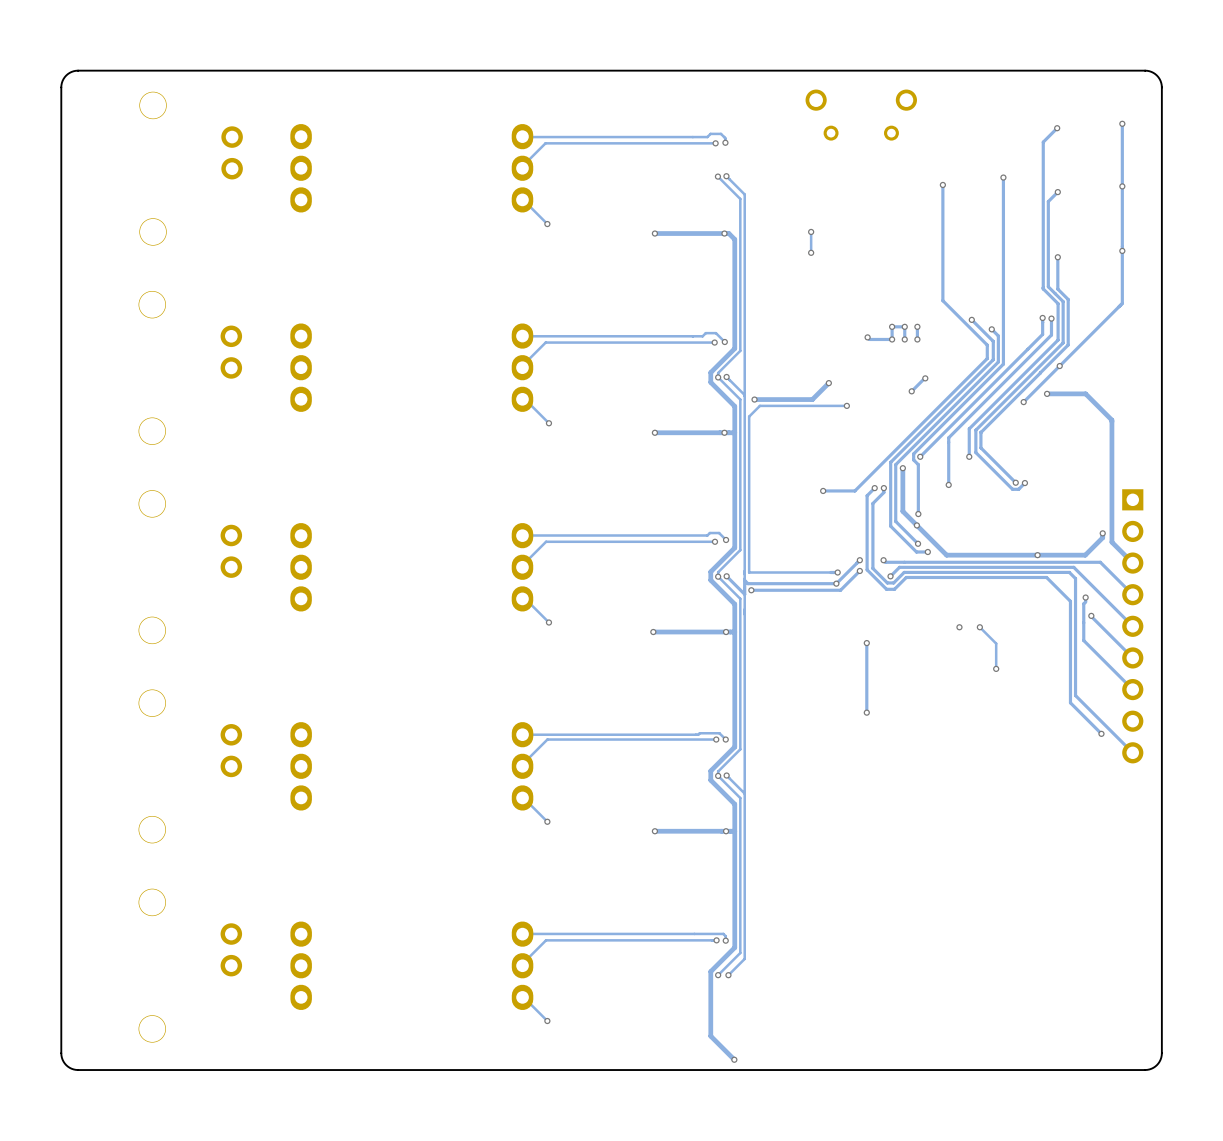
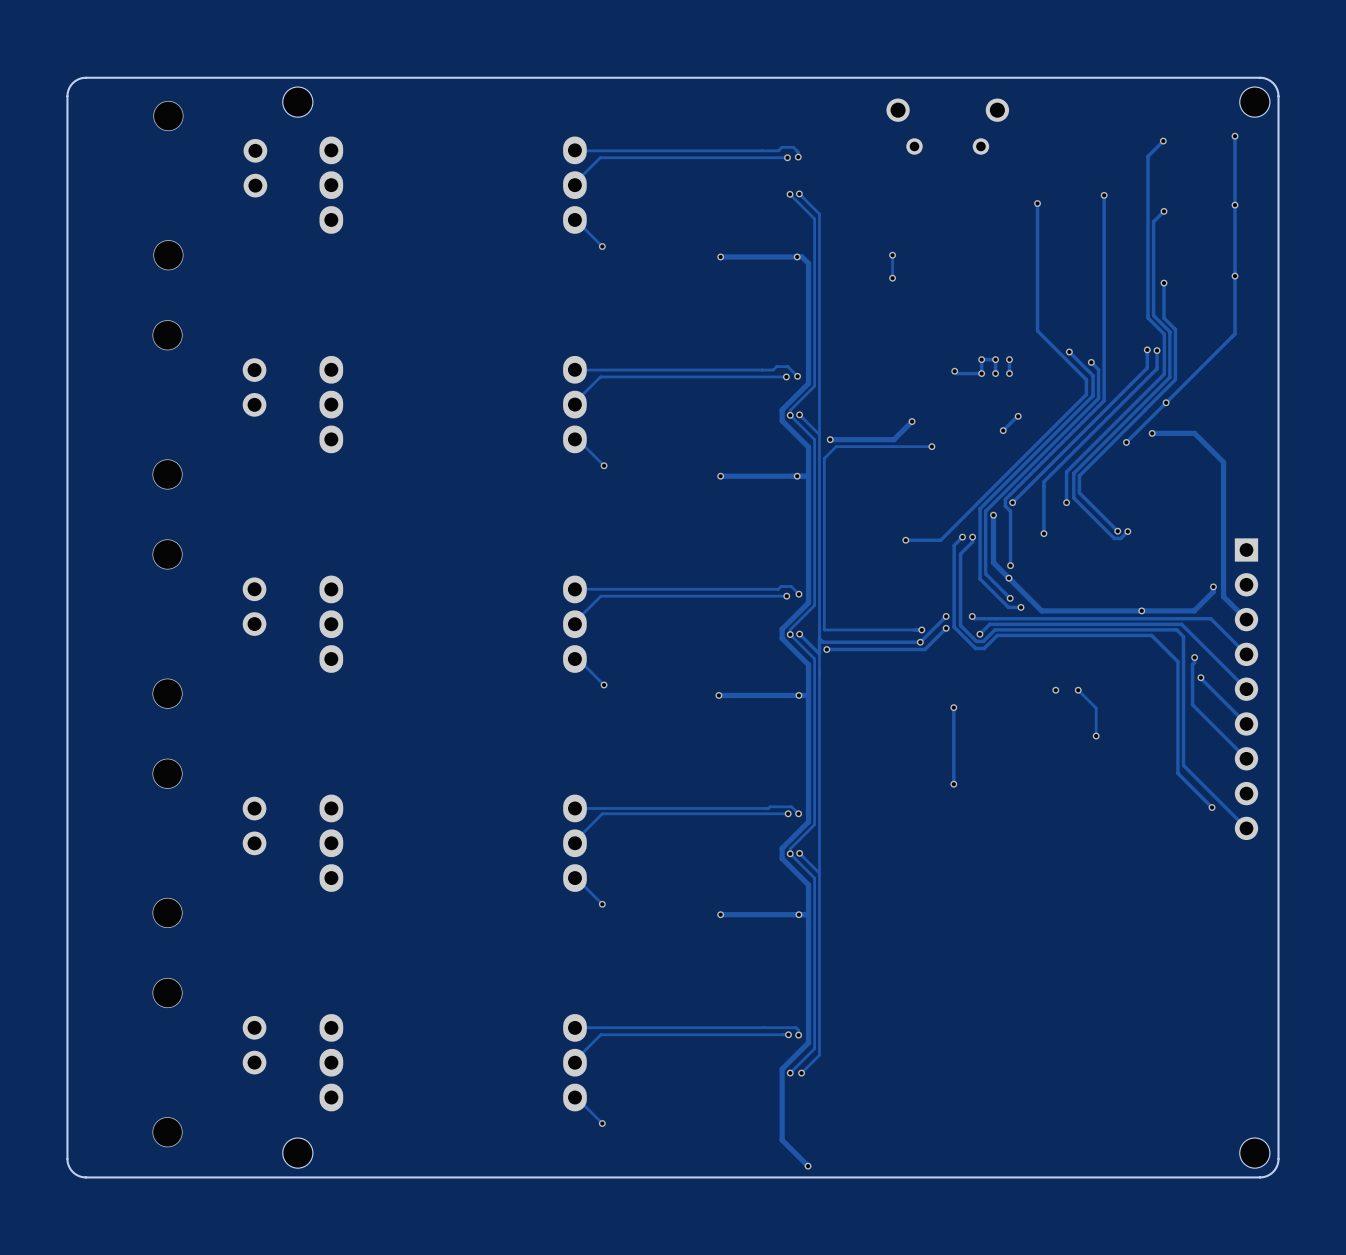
part: none -> (297, 102)
part: none -> (1254, 102)
part: none -> (297, 1153)
part: none -> (1254, 1153)

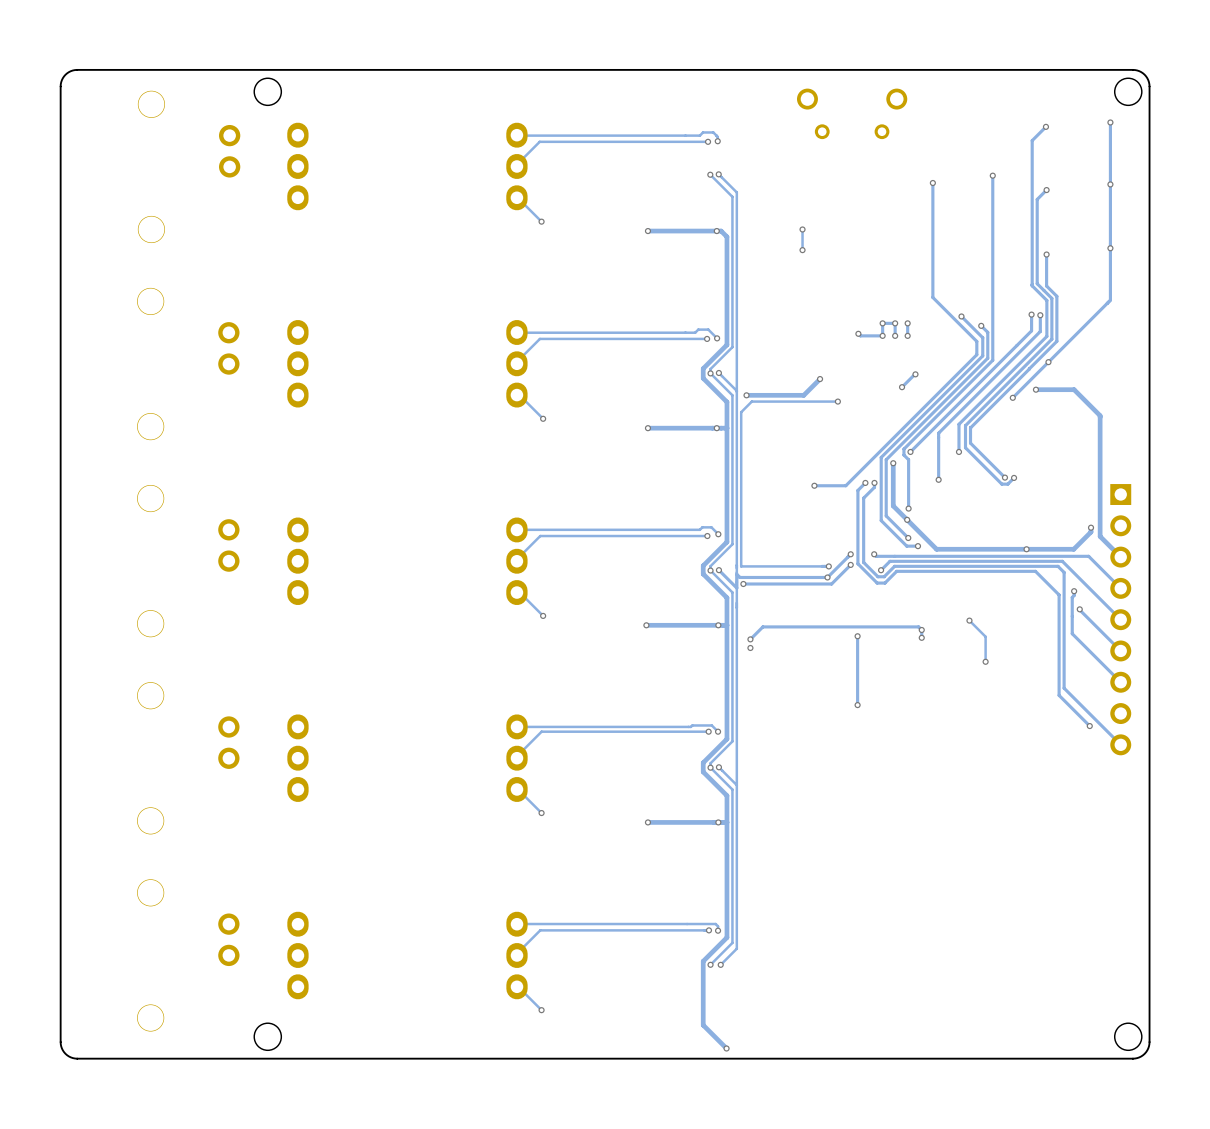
via: (1055, 690) -> none
via: none -> (921, 629)
track: none -> (921, 637) (921, 629) (918, 626) (762, 626) (750, 639)
via: none -> (921, 637)
via: none -> (750, 639)
via: none -> (750, 647)

